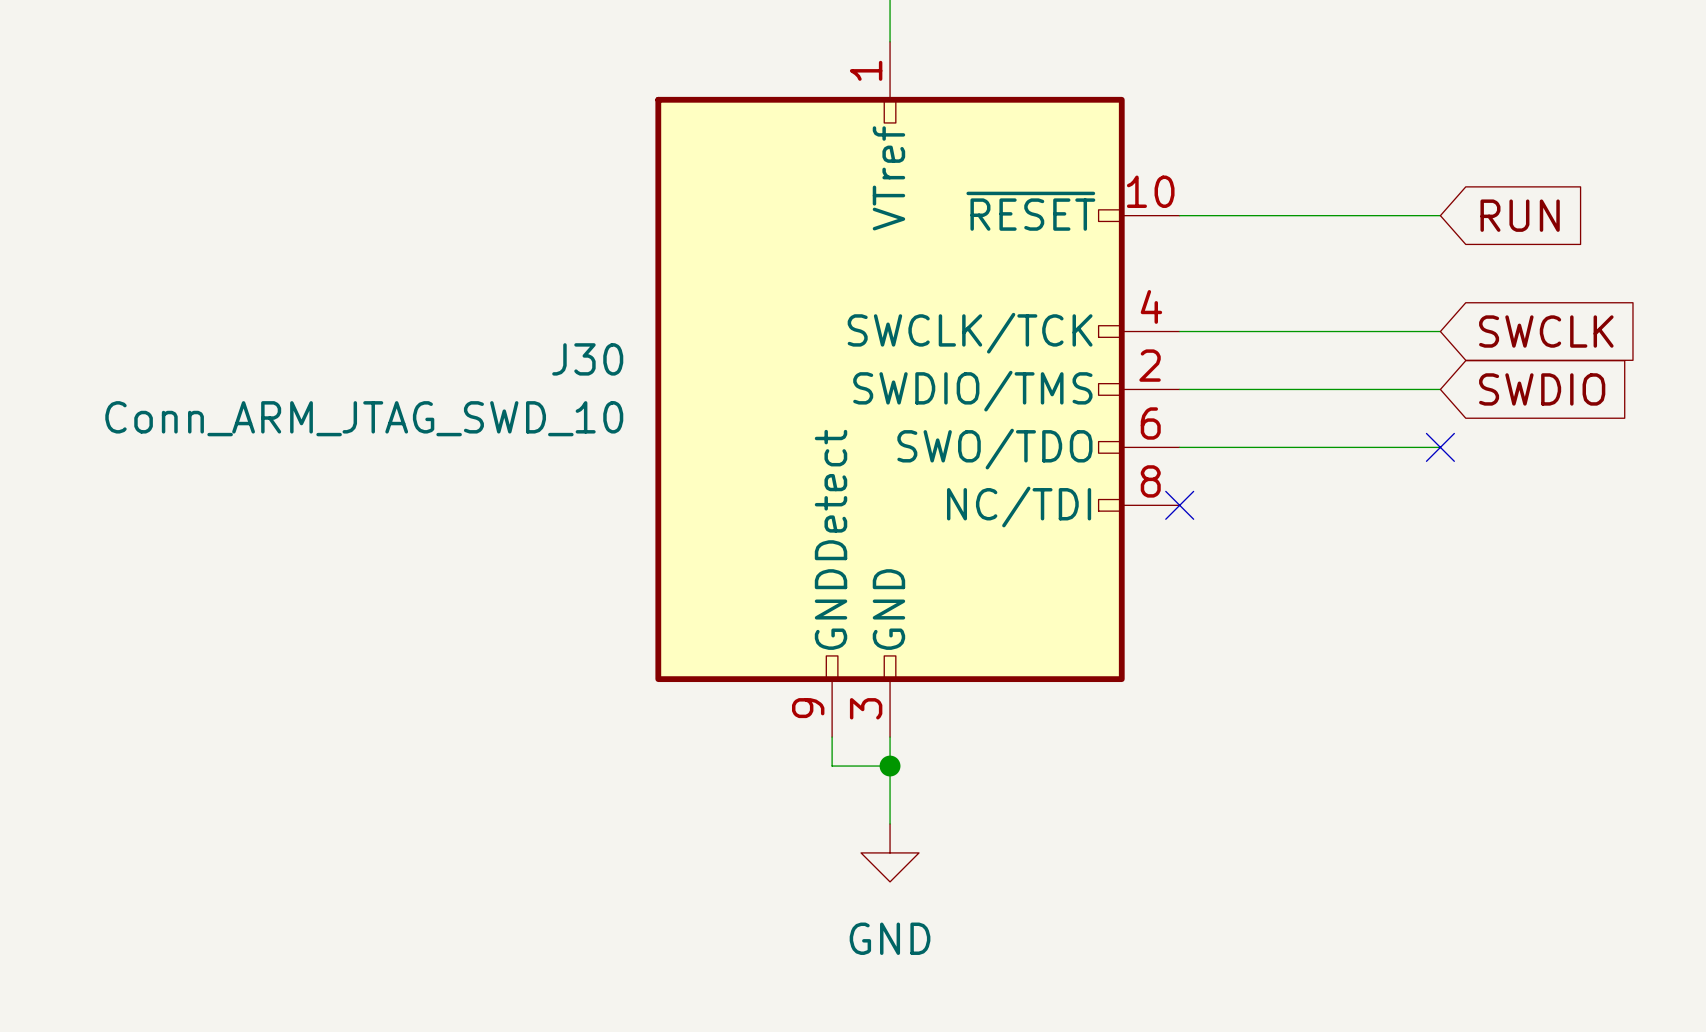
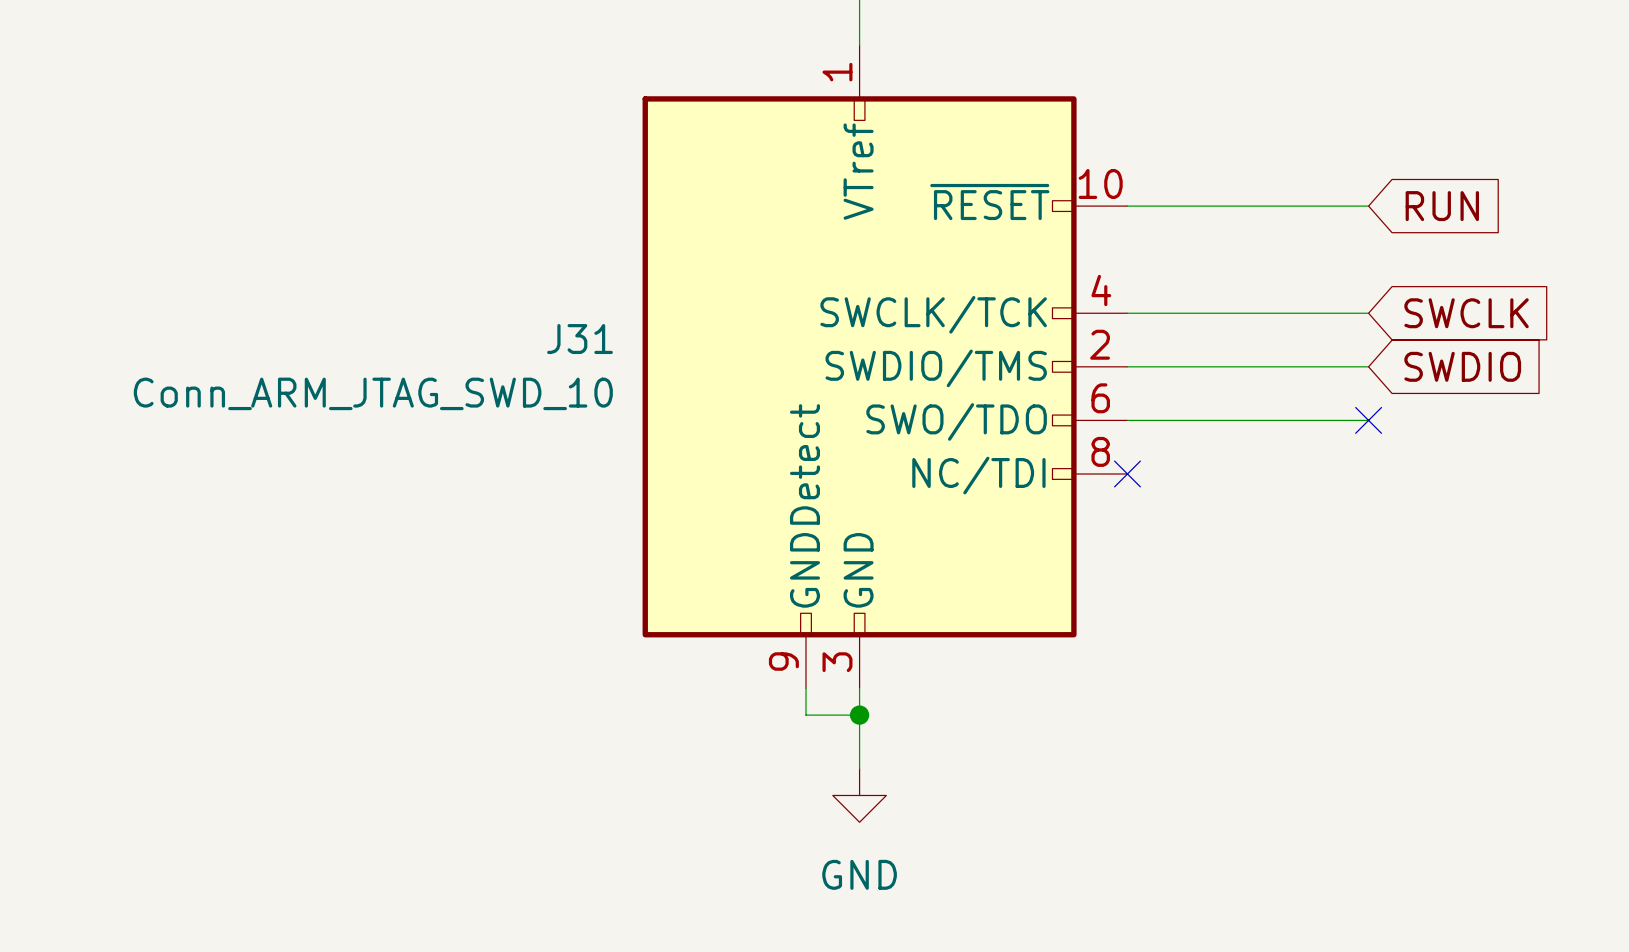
J30 name: J30 (587, 359) -> J31 (579, 339)

